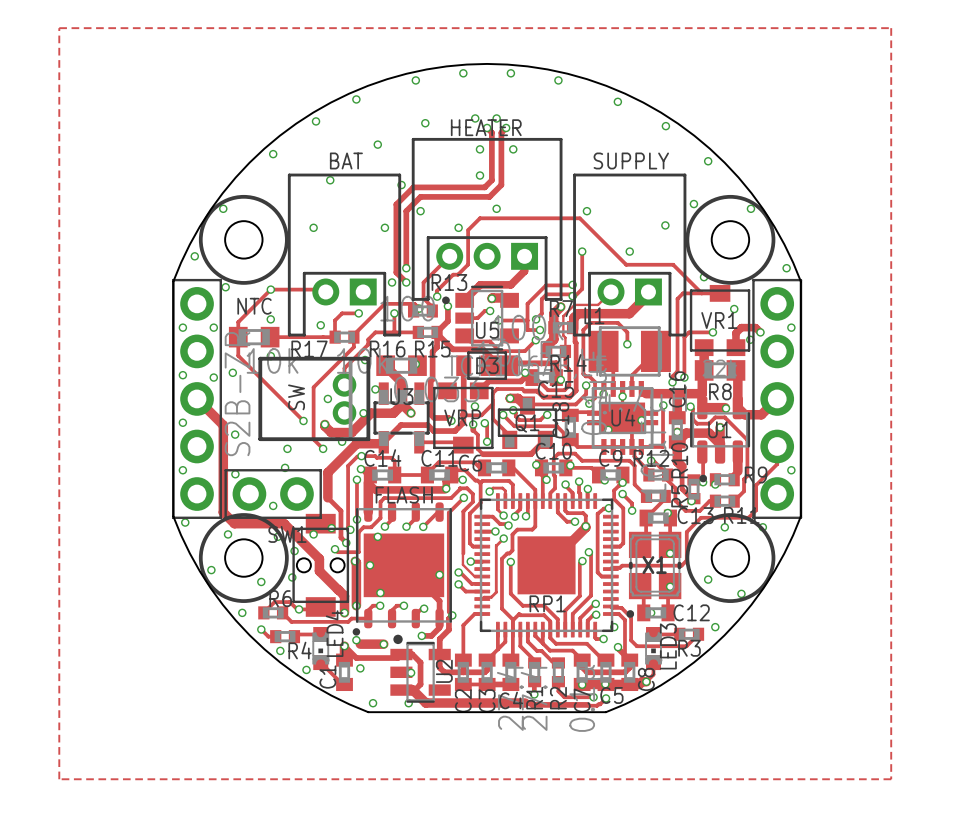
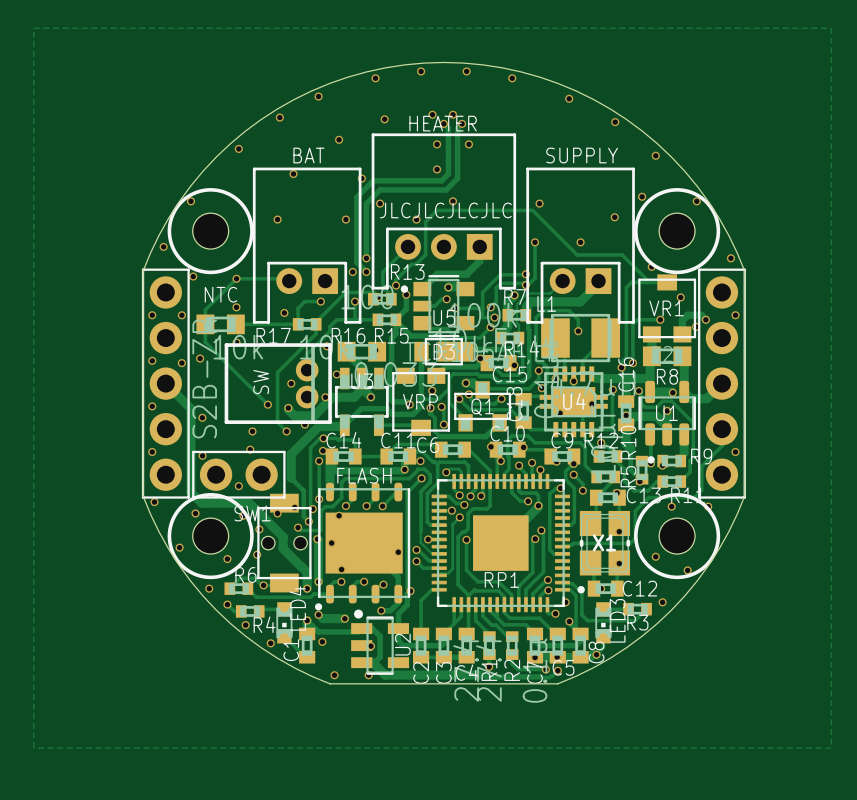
text: none -> JLCJLCJLCJLC (445, 210)

